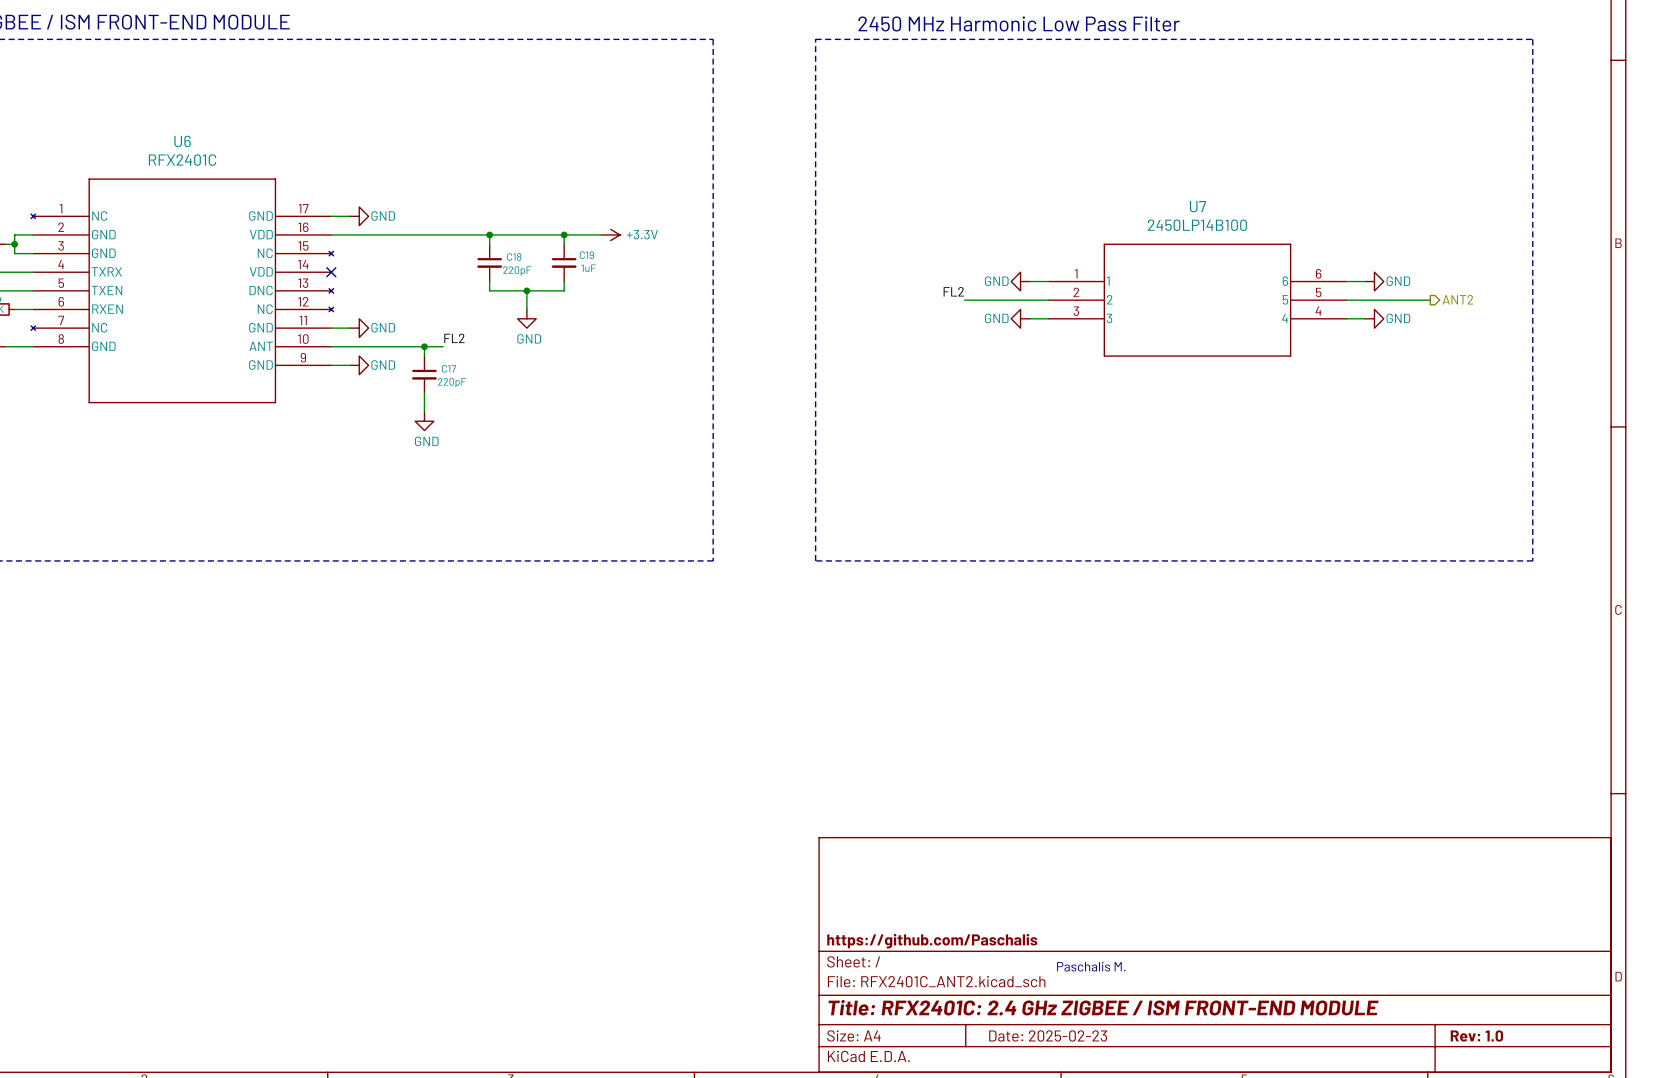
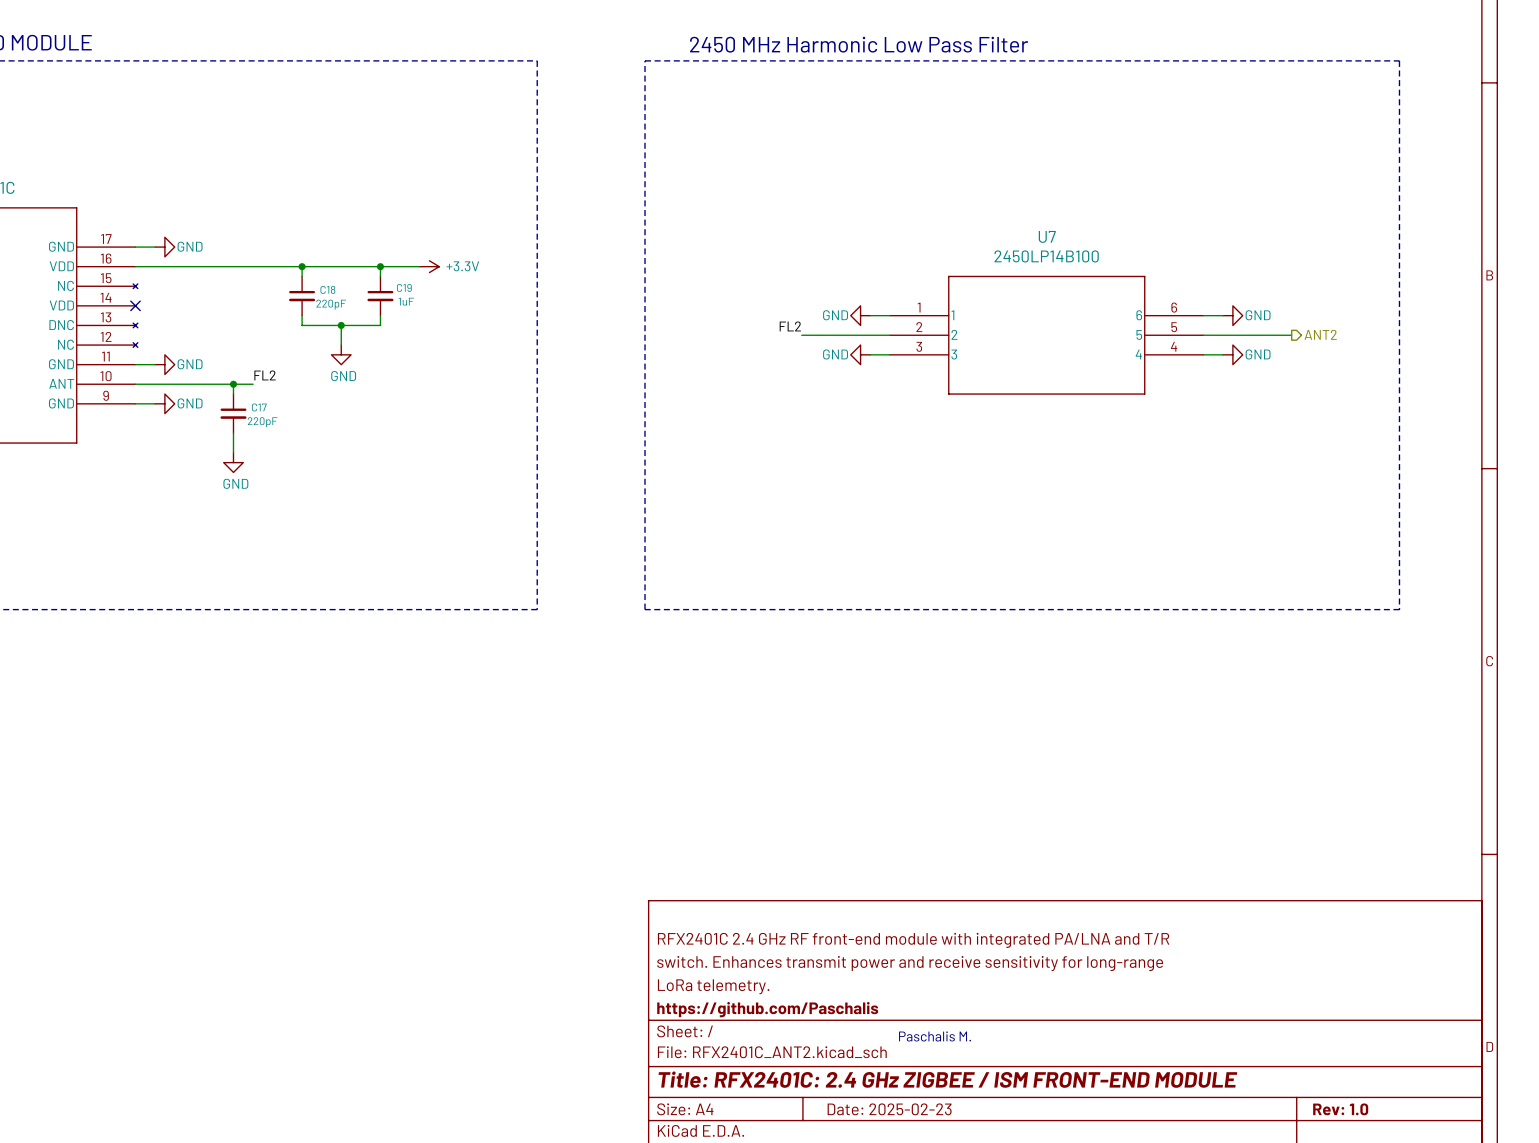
title block: none -> RFX2401C 2.4 GHz RF front-end module with integrated PA/LNA and T/R (913, 940)
title block: none -> switch. Enhances transmit power and receive sensitivity for long-range (910, 963)
title block: none -> LoRa telemetry. (713, 986)

